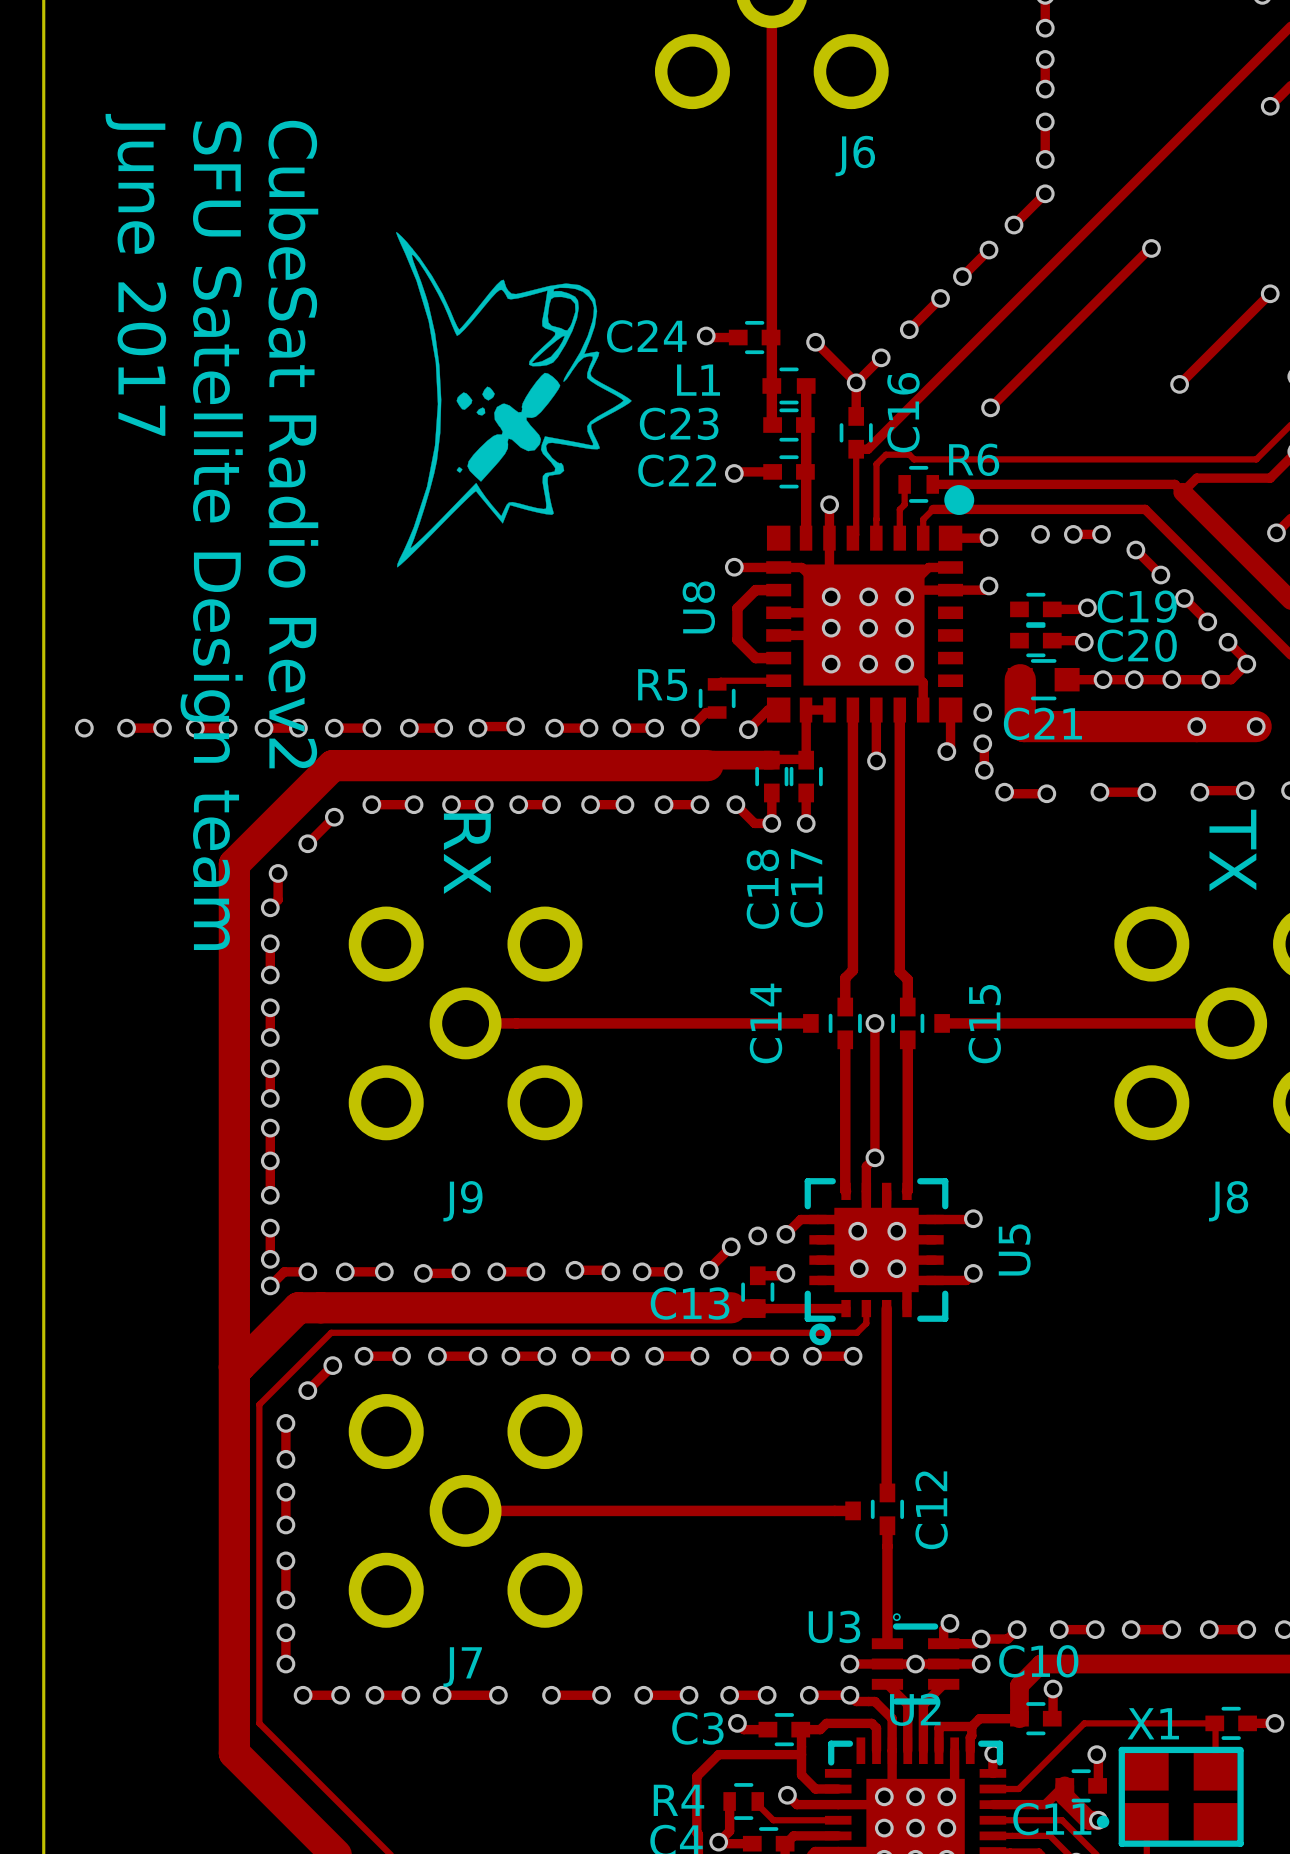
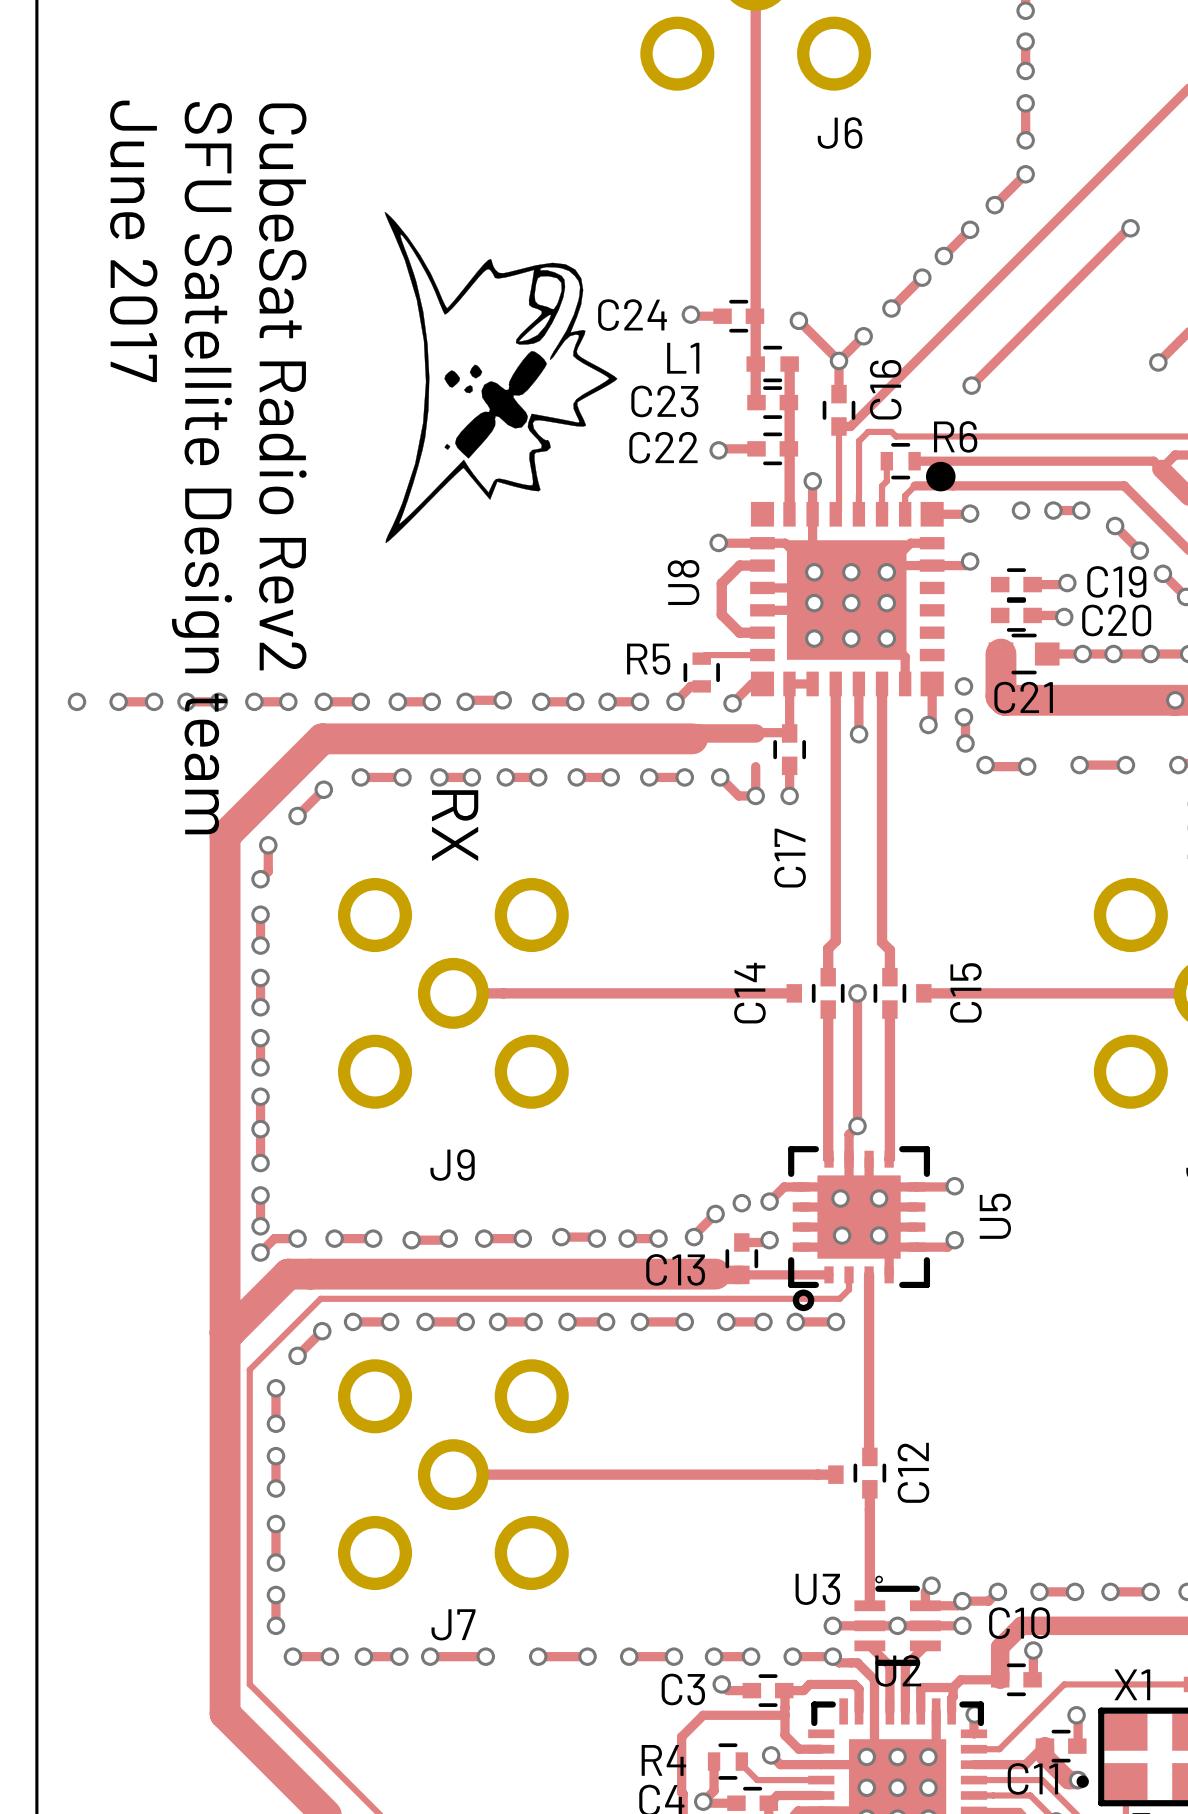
C18: (771, 776) -> none

